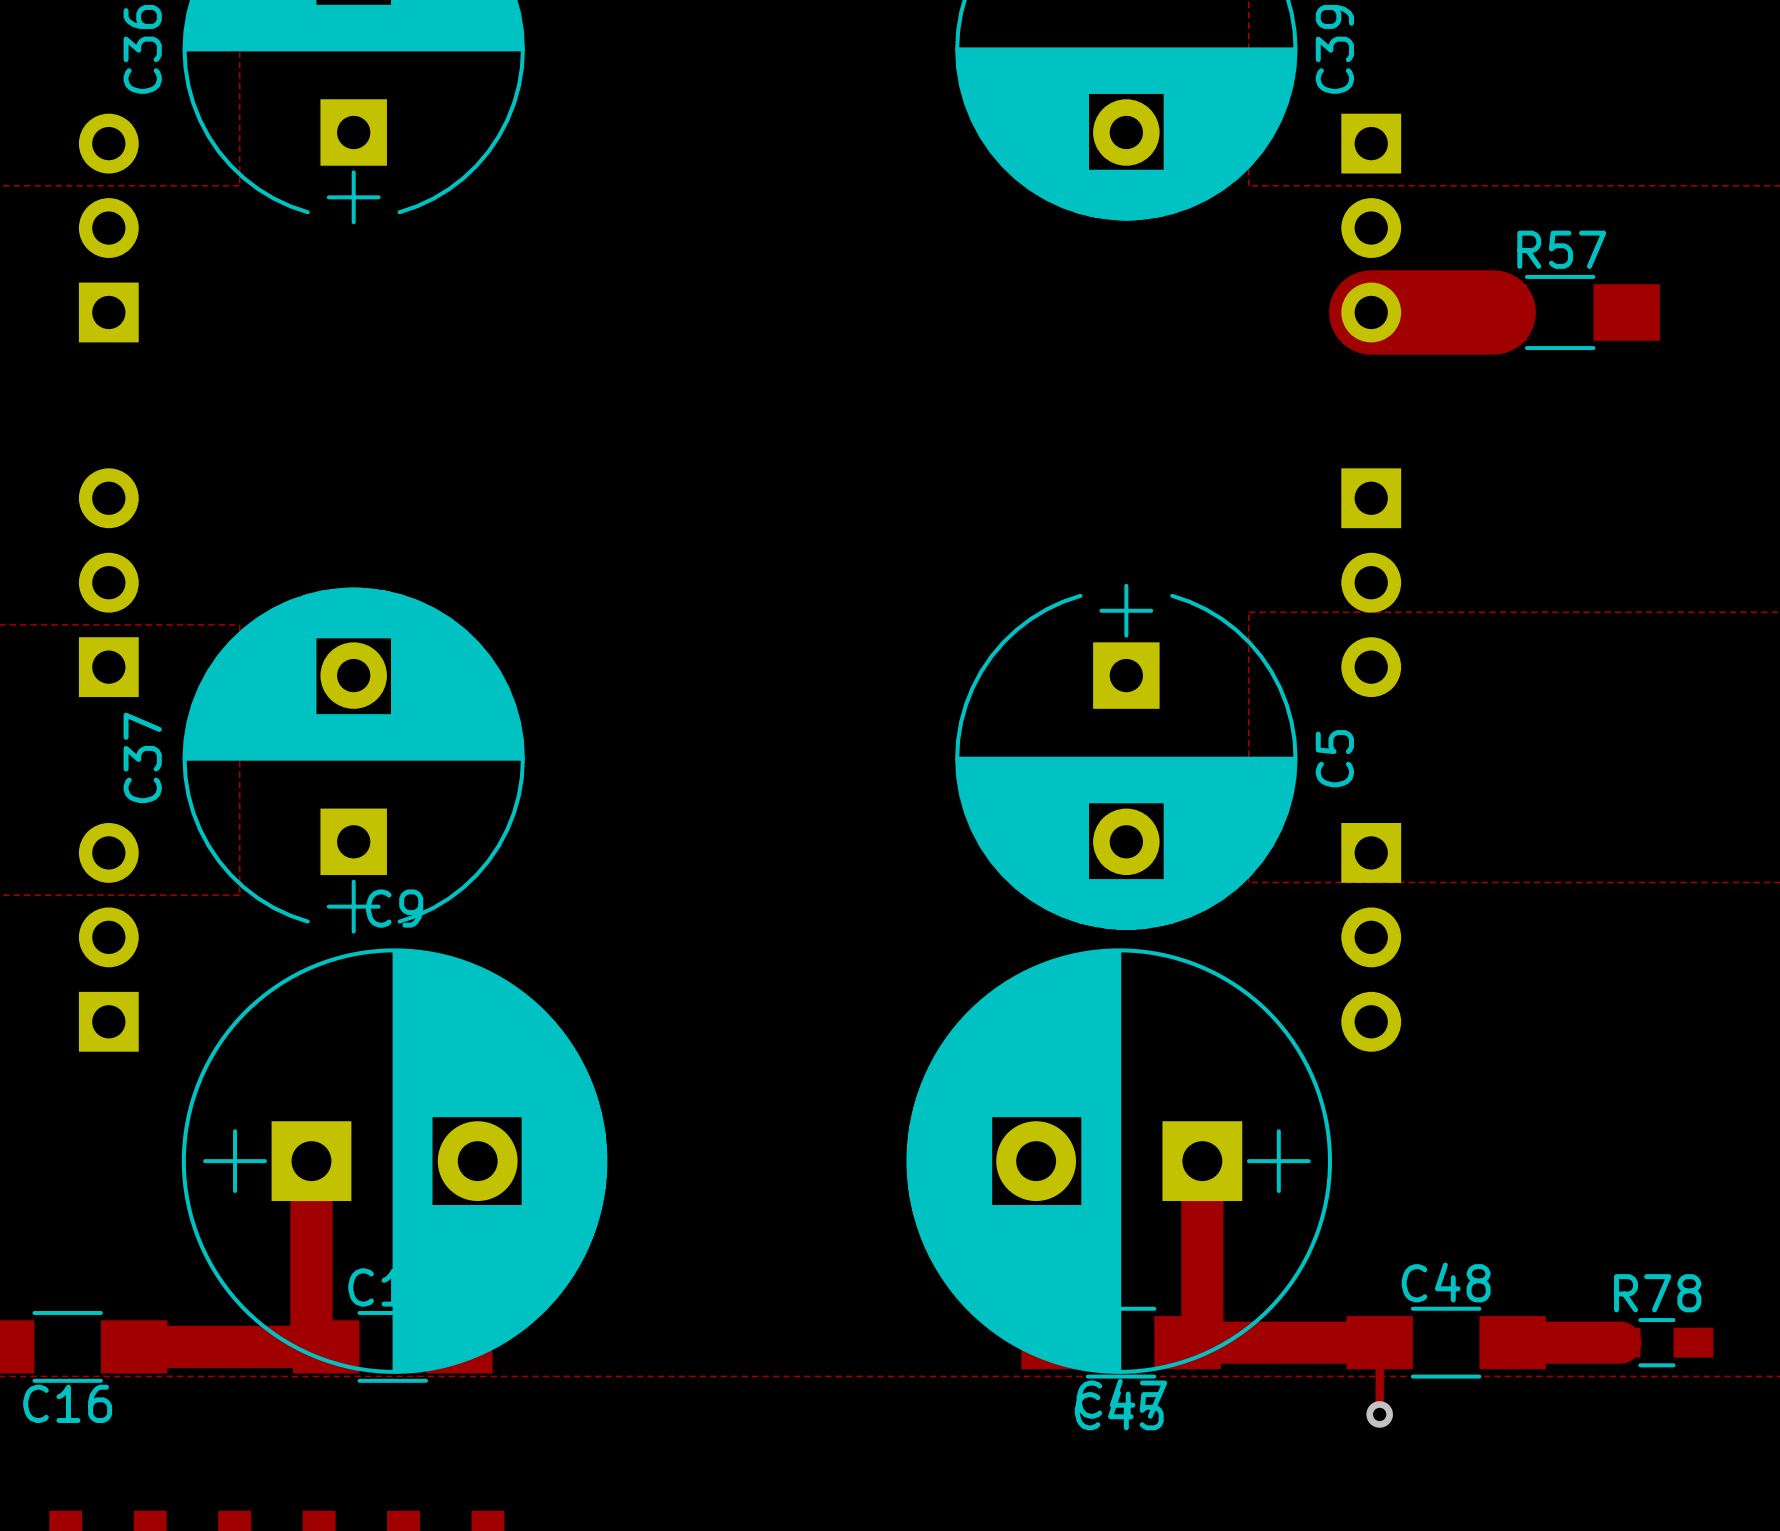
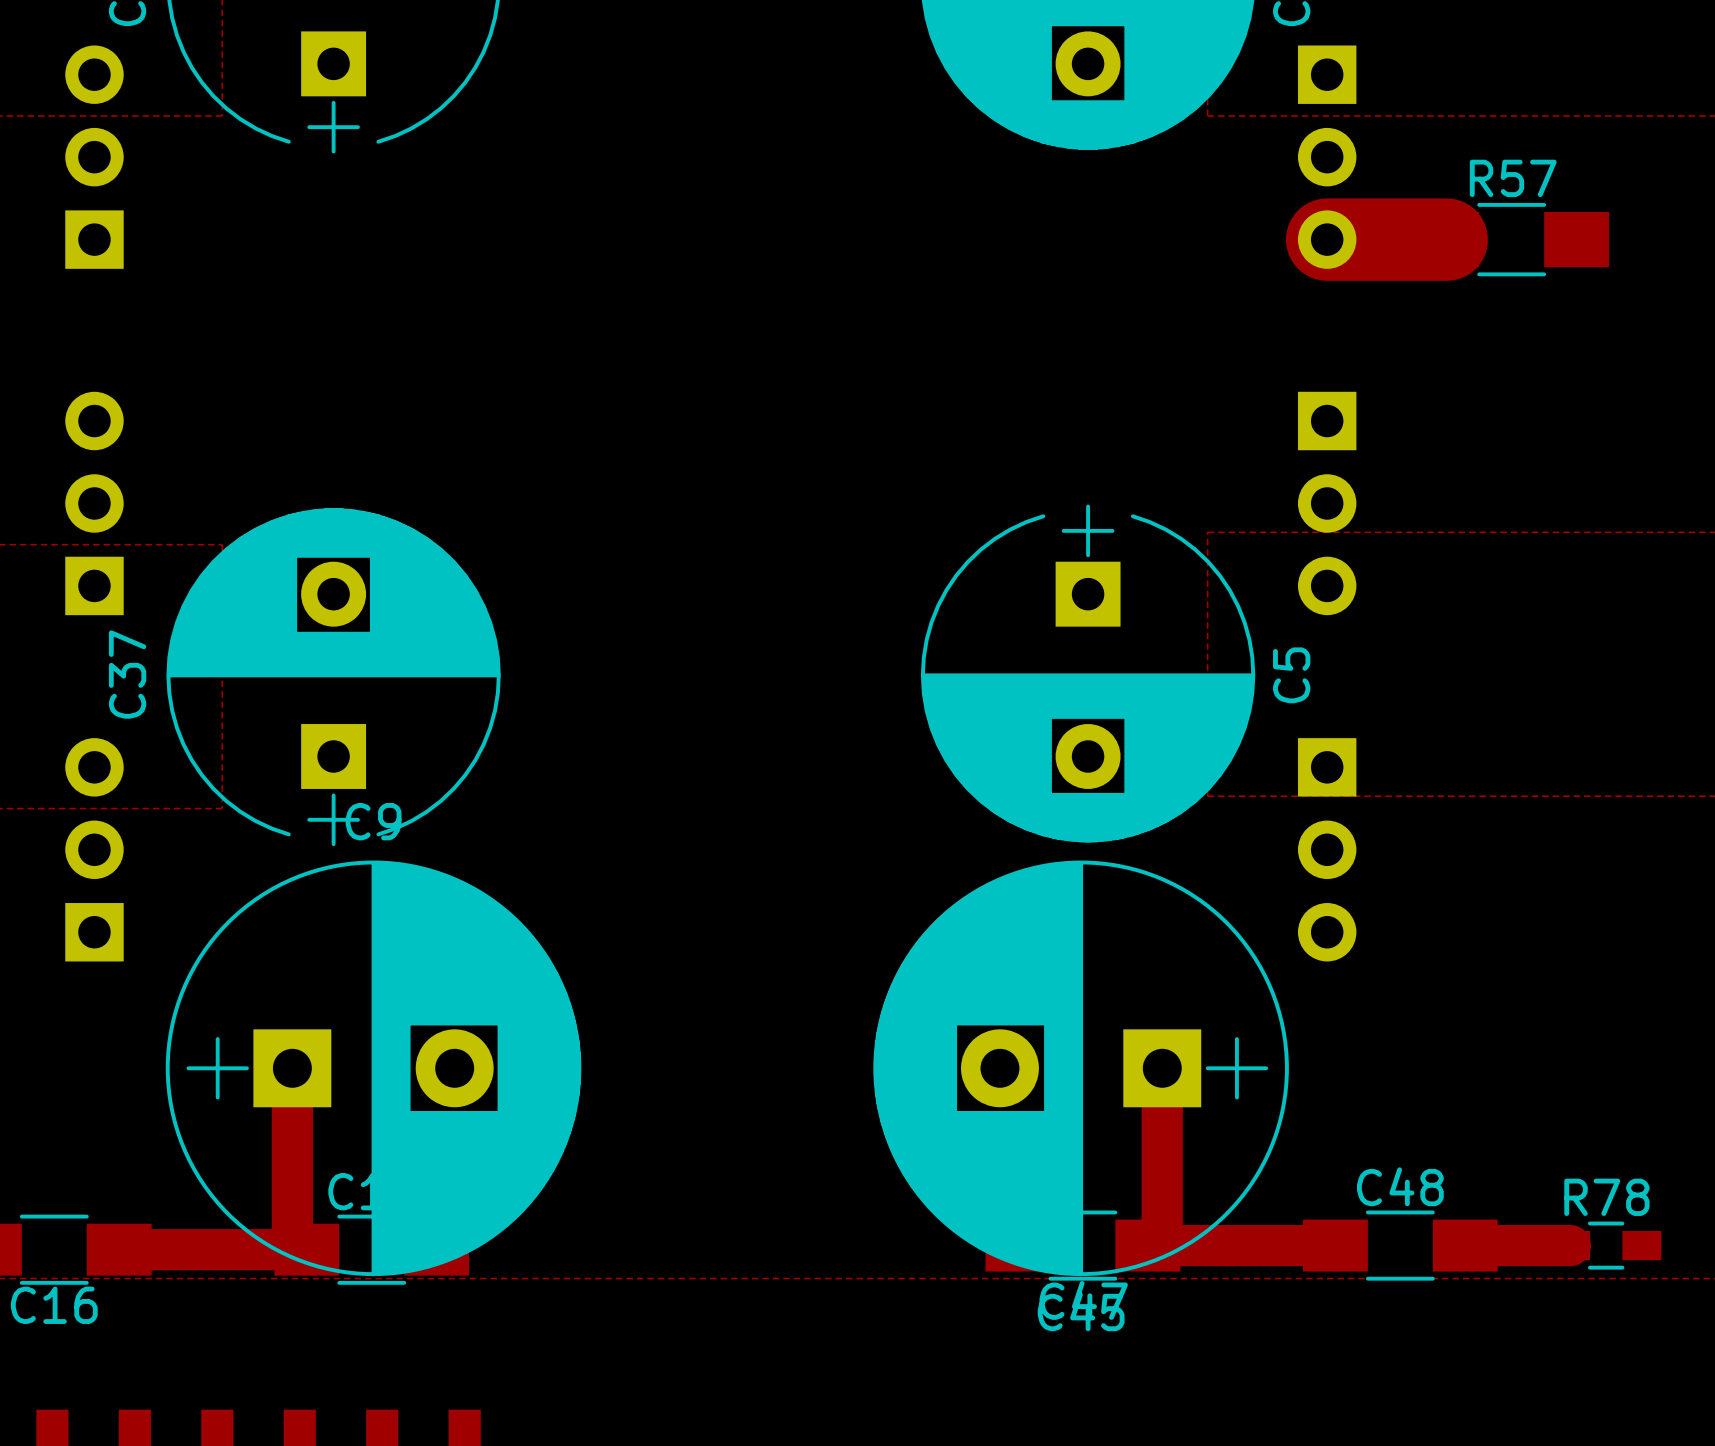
track: (1379, 1342) (1379, 1414) -> none
via: (1379, 1414) -> none

